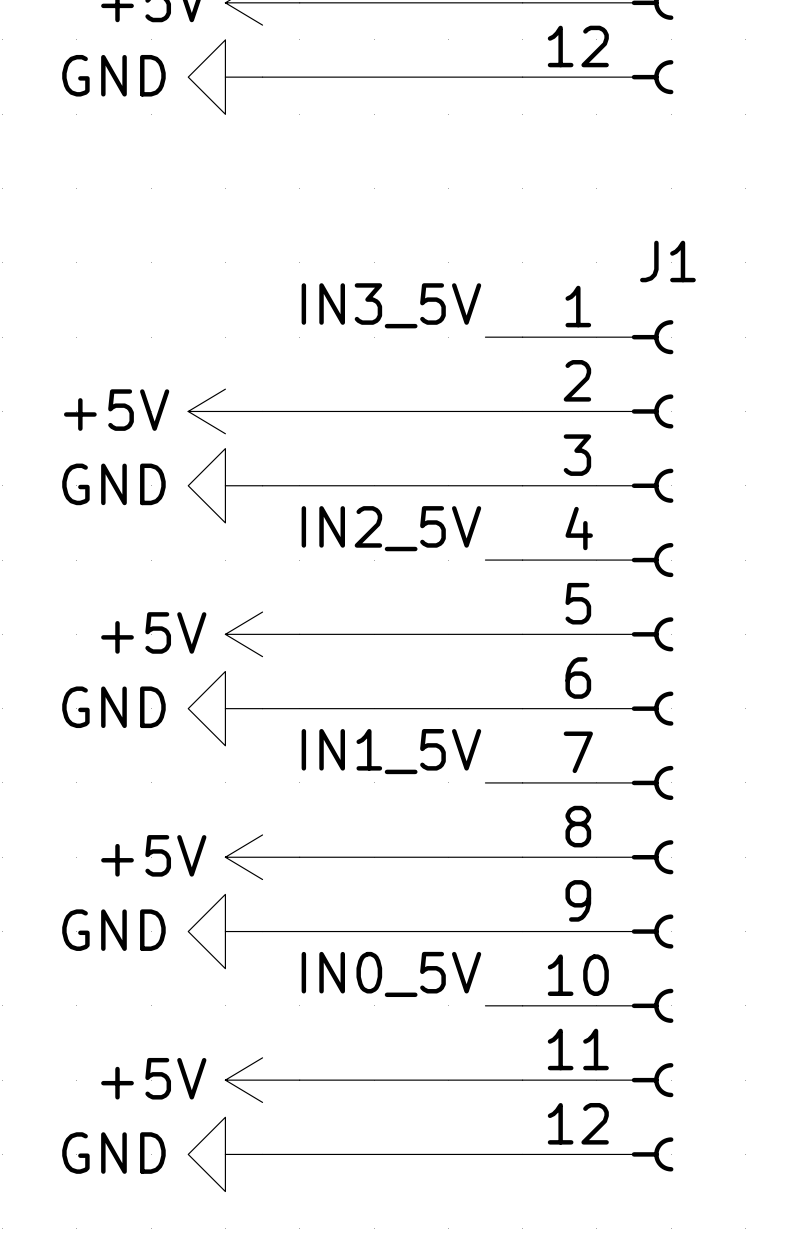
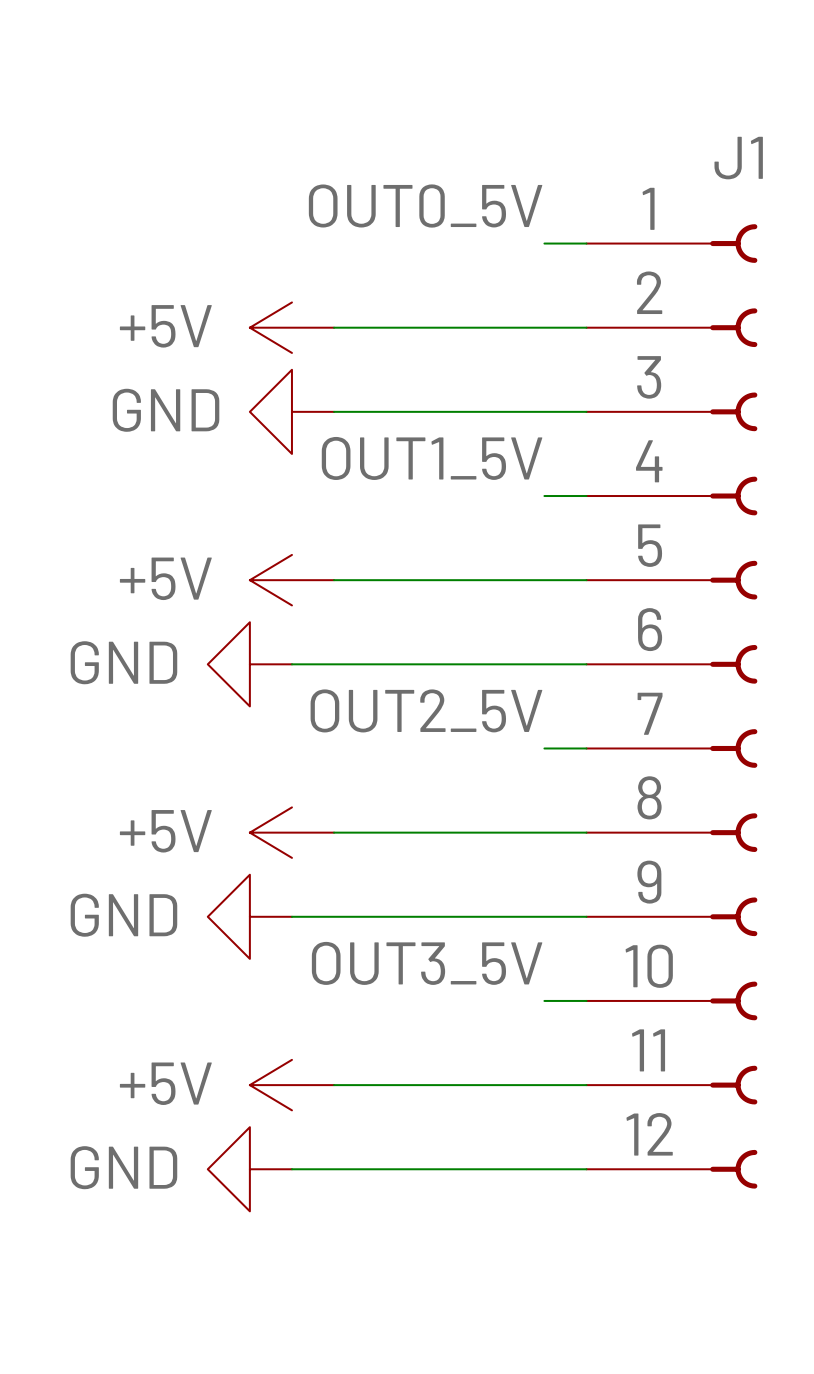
label: IN3_5V (391, 305) -> OUT0_5V (425, 206)
power symbol position: +5V (225, 411) -> +5V (291, 327)
power symbol position: GND (225, 485) -> GND (291, 411)
label: IN2_5V (391, 528) -> OUT1_5V (432, 458)
label: IN1_5V (391, 751) -> OUT2_5V (426, 710)
label: IN0_5V (391, 974) -> OUT3_5V (427, 963)

